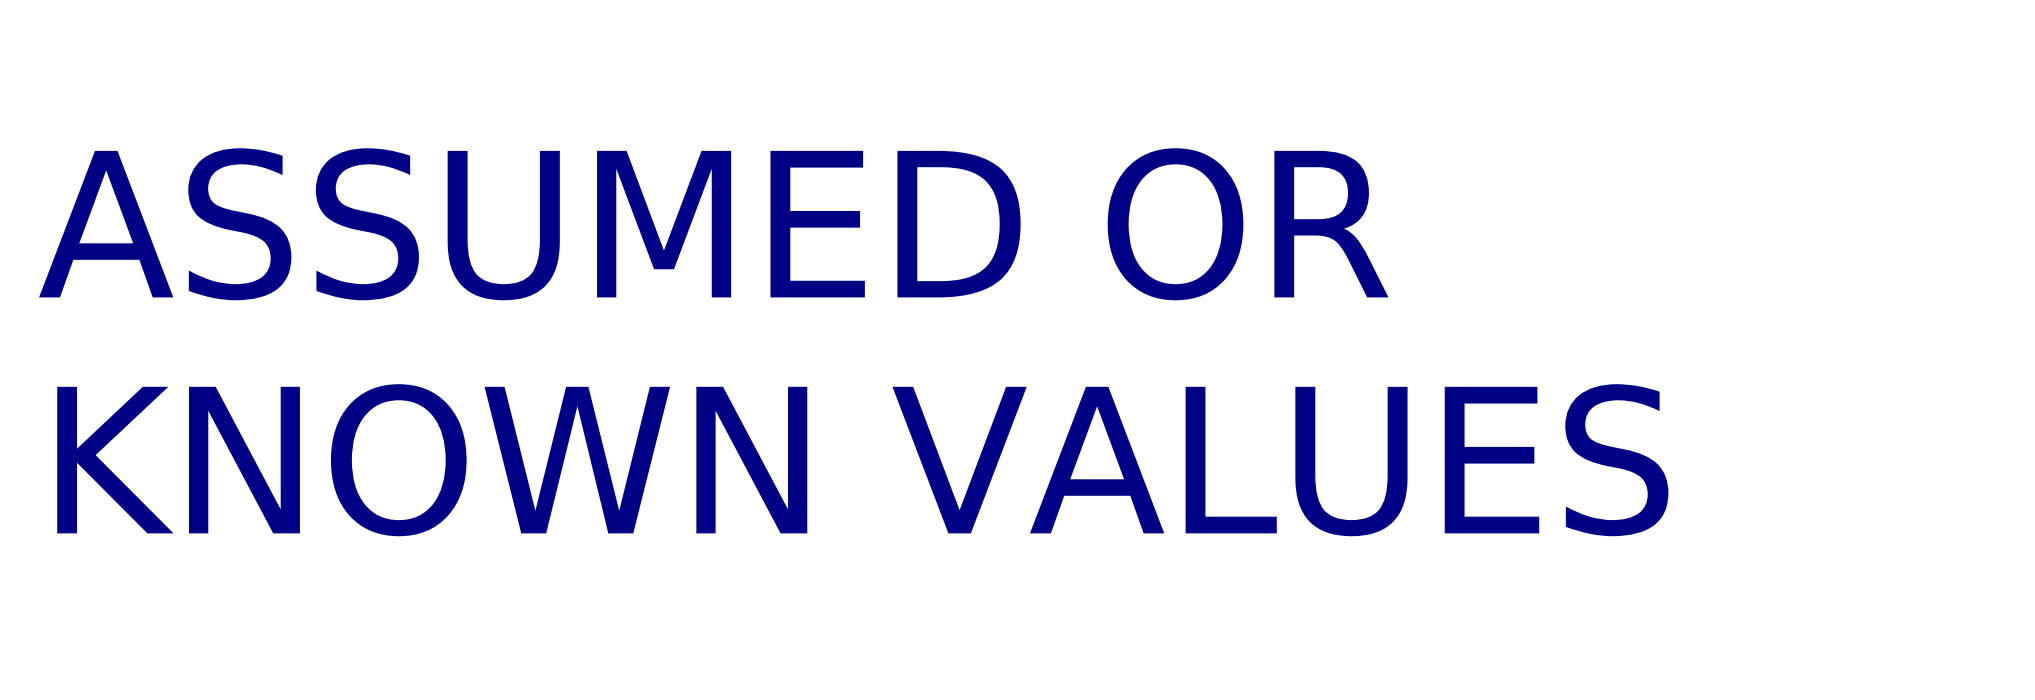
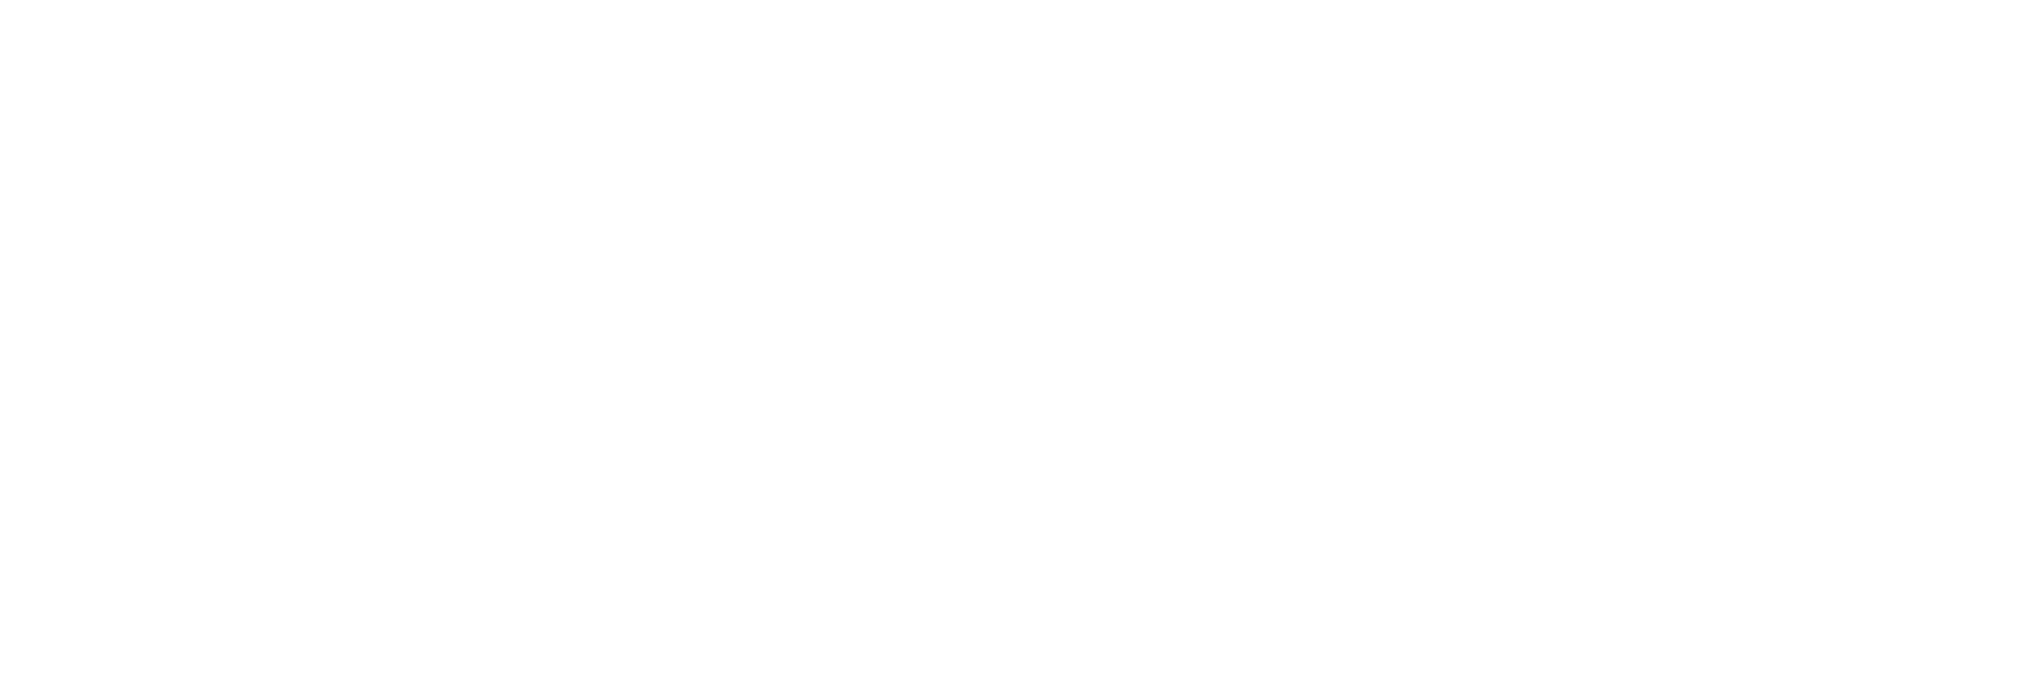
text: ASSUMED OR (713, 224) -> none
text: KNOWN VALUES (862, 460) -> none

